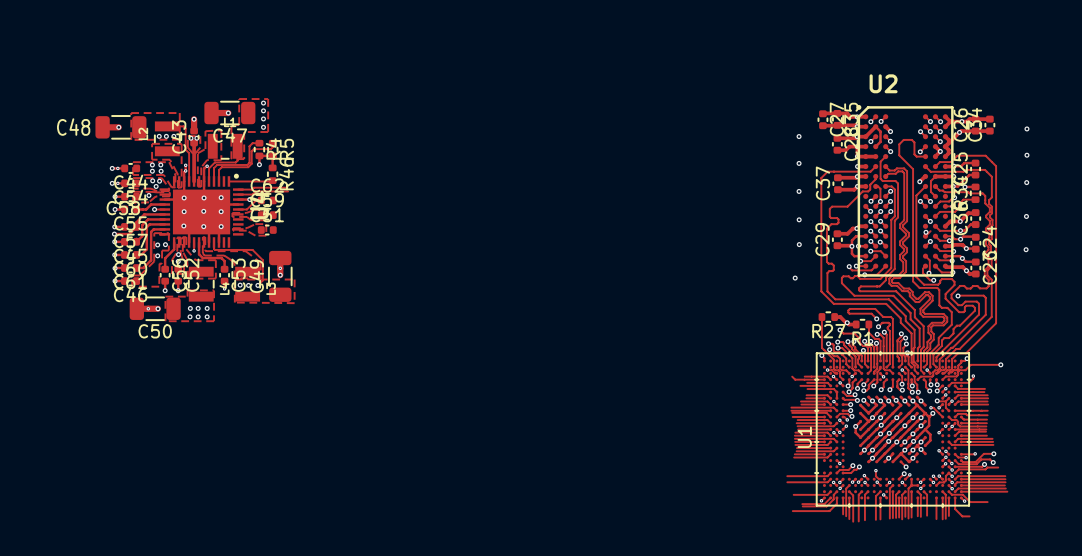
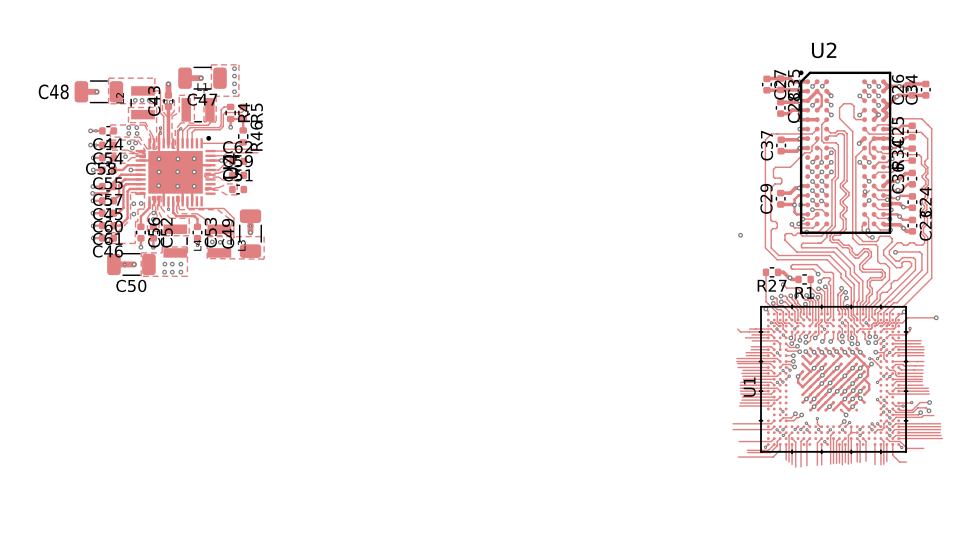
via: (1026, 128) -> none
via: (799, 136) -> none
via: (1026, 155) -> none
via: (799, 163) -> none
via: (1026, 182) -> none
via: (799, 191) -> none
via: (1026, 216) -> none
via: (799, 219) -> none
via: (799, 244) -> none
via: (1026, 249) -> none

